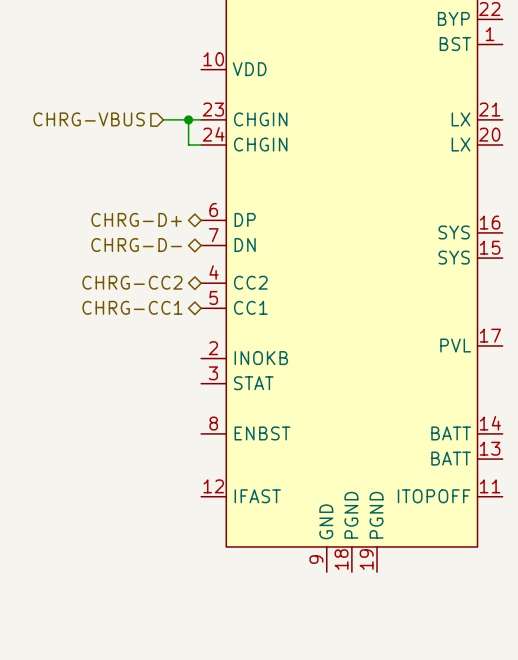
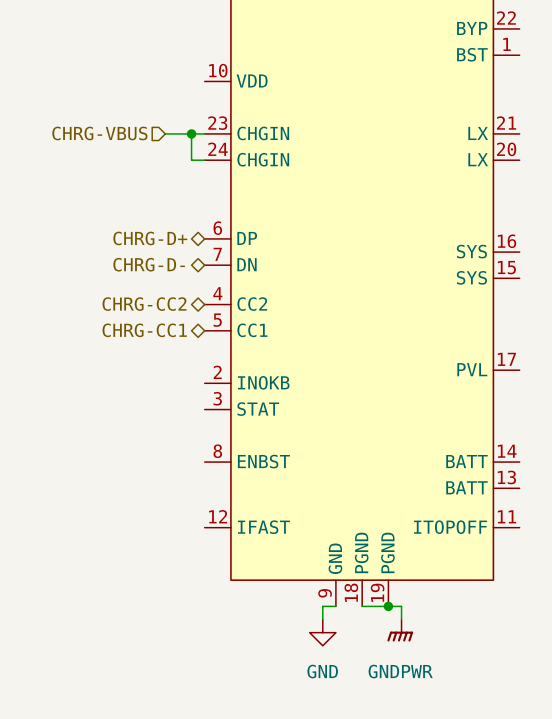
wire: none -> (335, 606) (322, 606) (322, 619)
wire: none -> (362, 606) (401, 606) (401, 619)
junction: none -> (388, 606)
power symbol: none -> GNDPWR (400, 630)
power symbol: none -> GND (322, 632)

